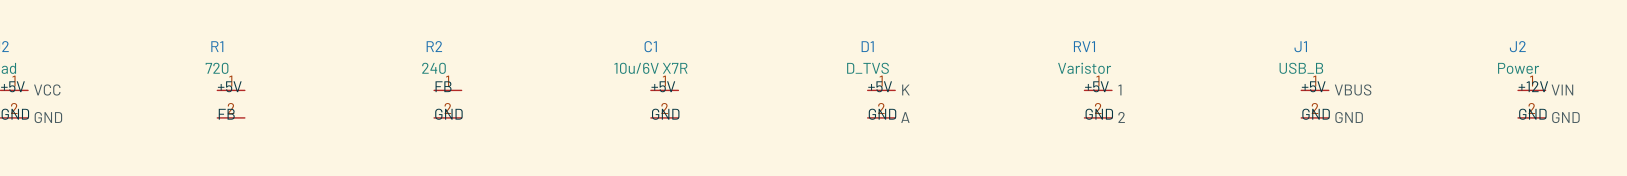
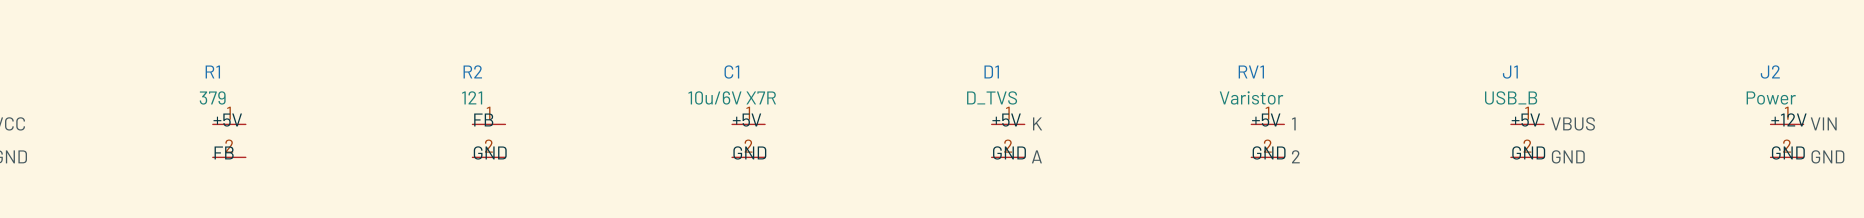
R1 value: 720 (217, 68) -> 379 (212, 97)
R2 value: 240 (433, 68) -> 121 (472, 97)

